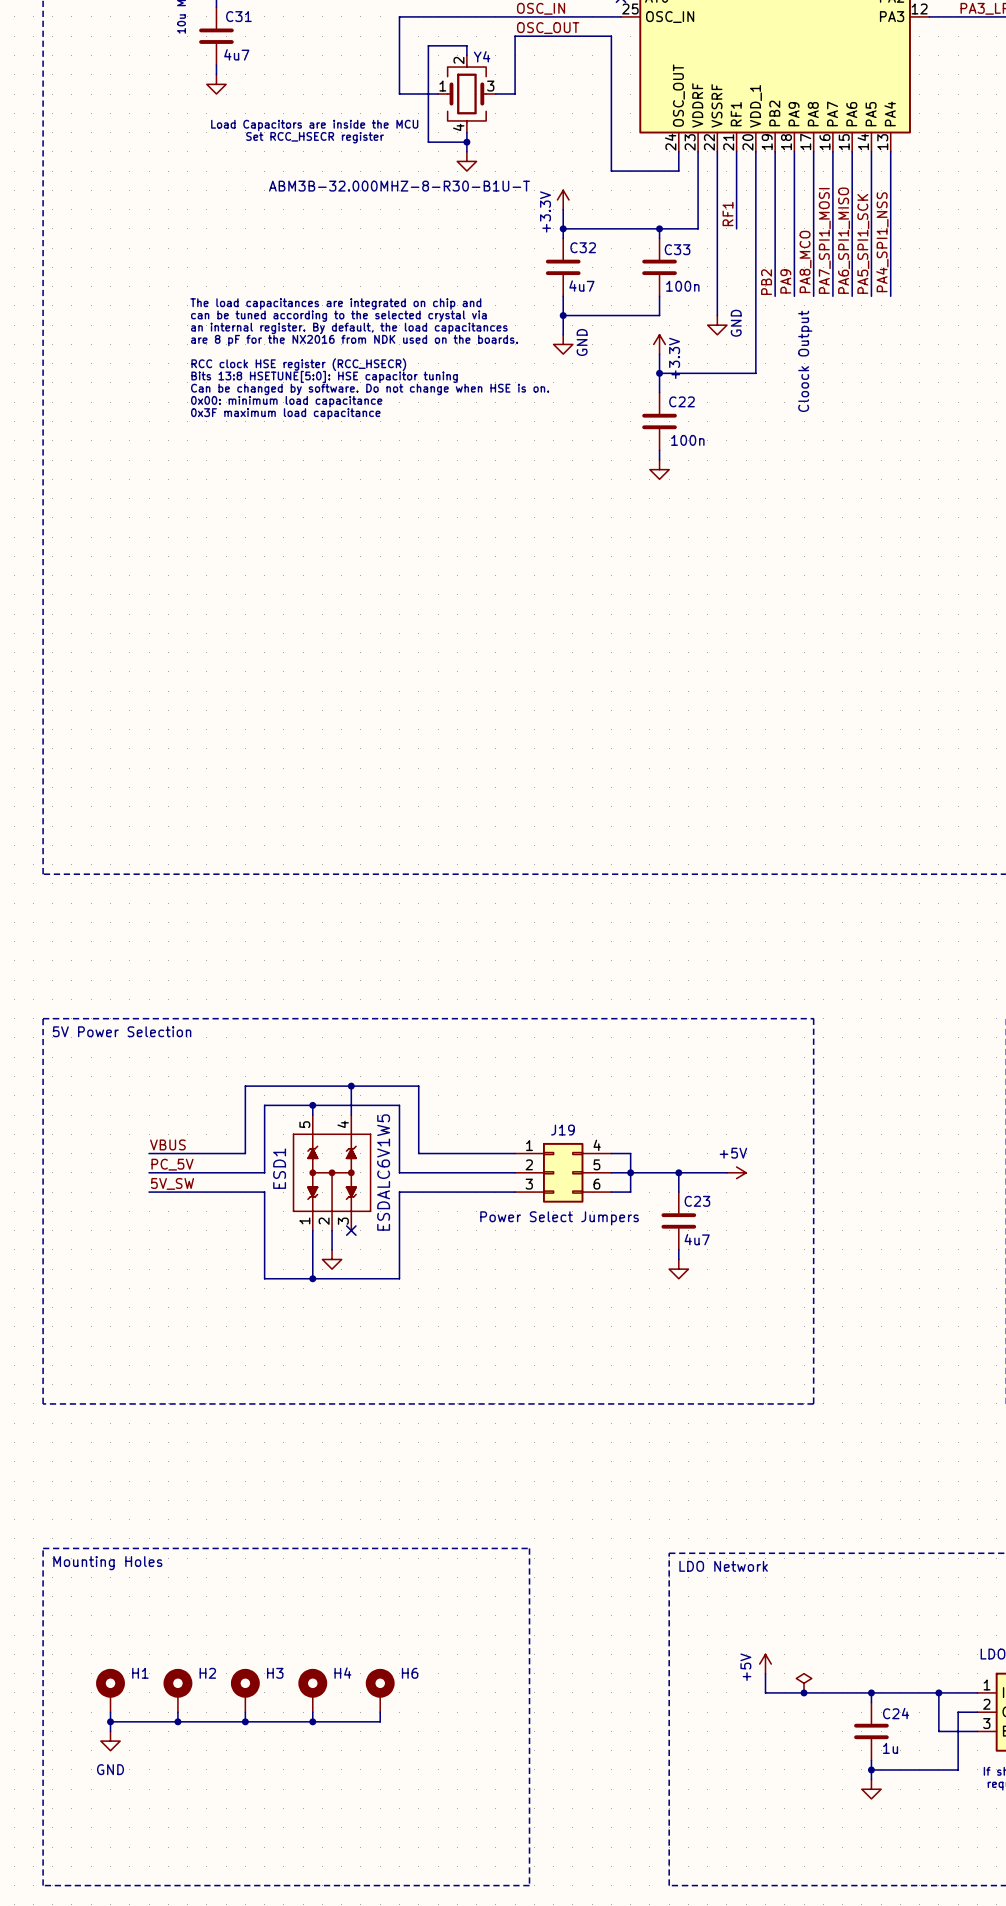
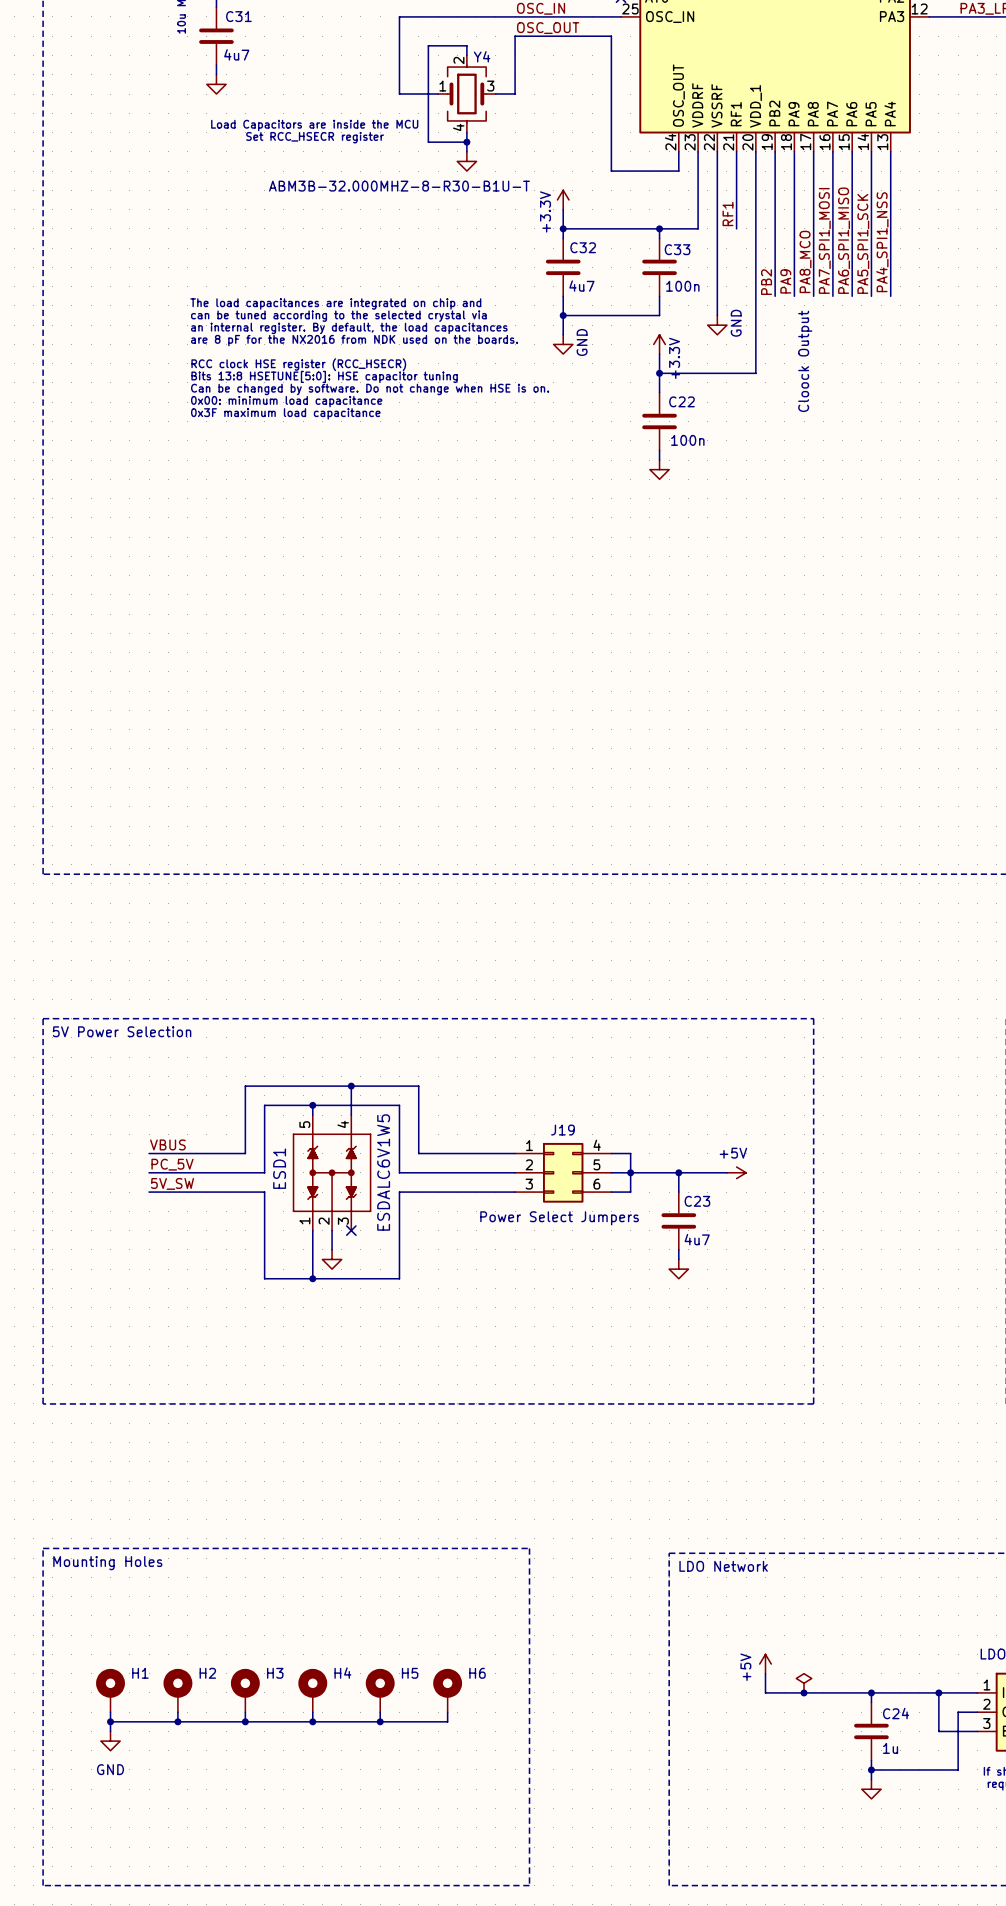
H6 name: H6 (410, 1673) -> H5 (410, 1673)
H6: none -> (447, 1690)
wire: none -> (447, 1712) (447, 1721) (380, 1721)
junction: none -> (380, 1721)

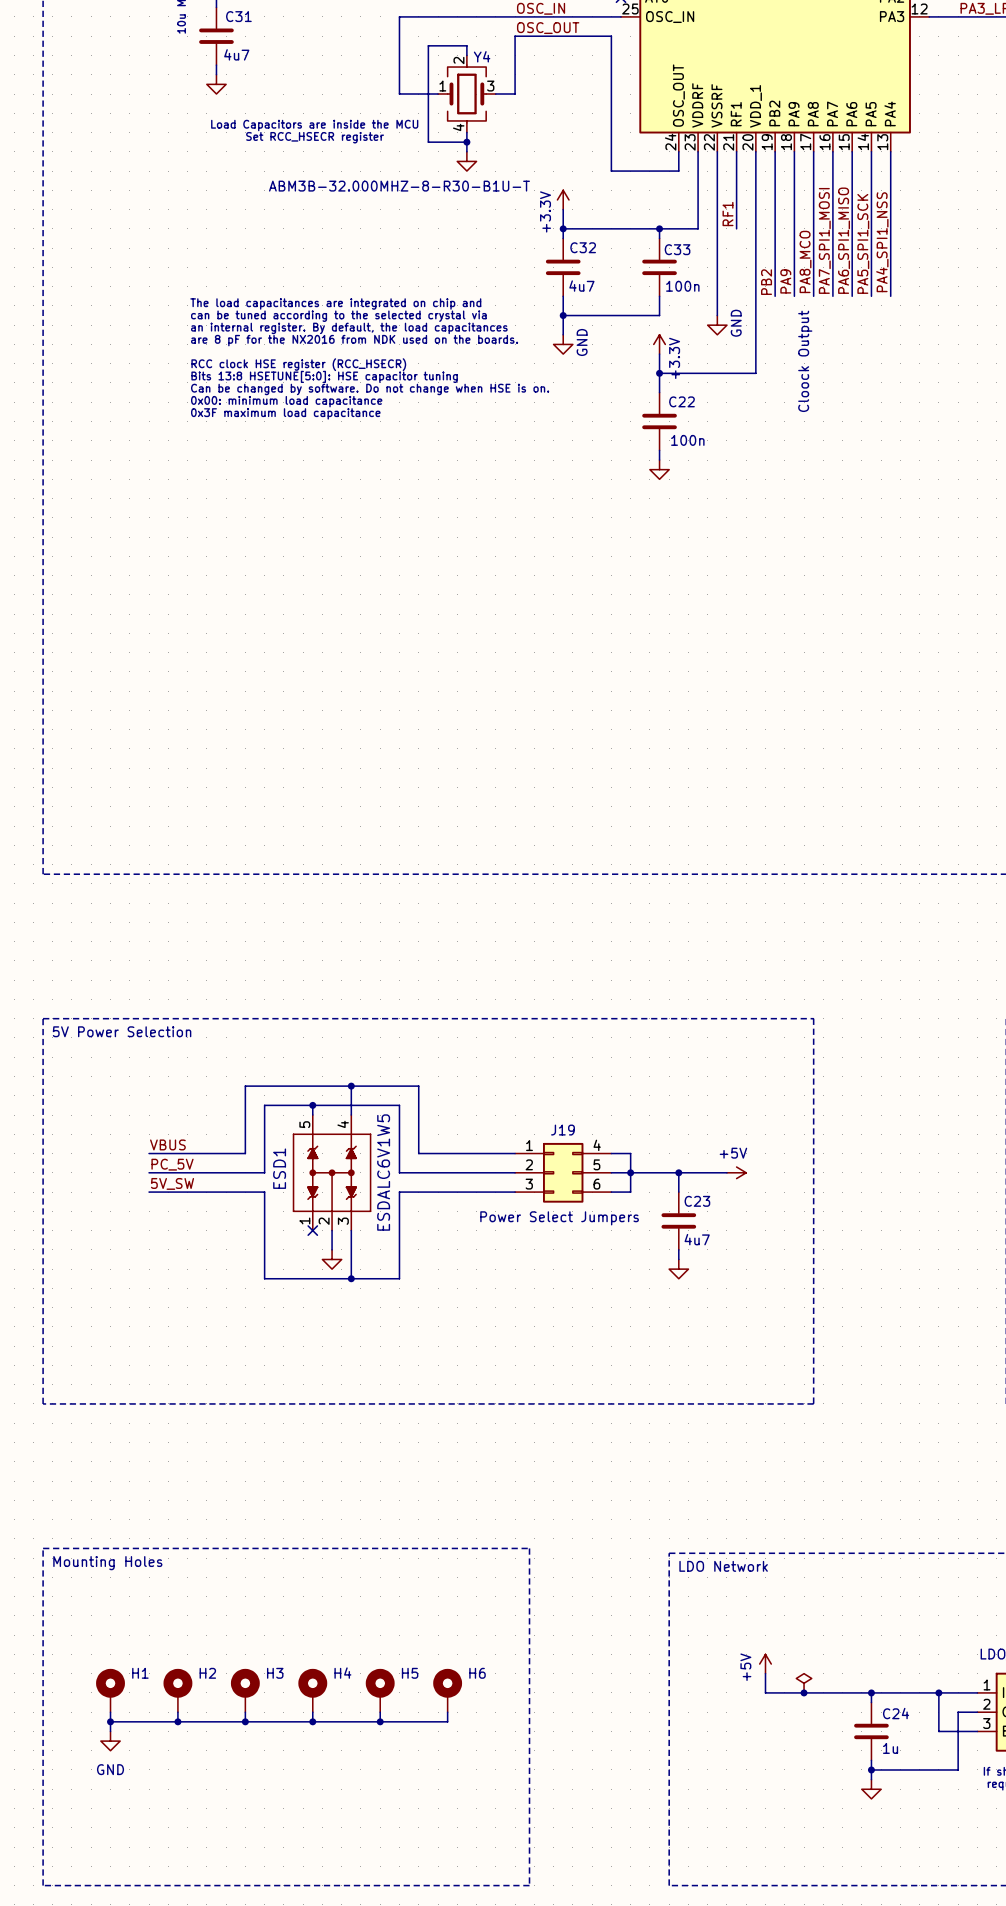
wire: (312, 1230) (312, 1278) -> (351, 1230) (351, 1278)
no-connect mark position: (351, 1230) -> (312, 1230)
junction position: (312, 1278) -> (351, 1278)

